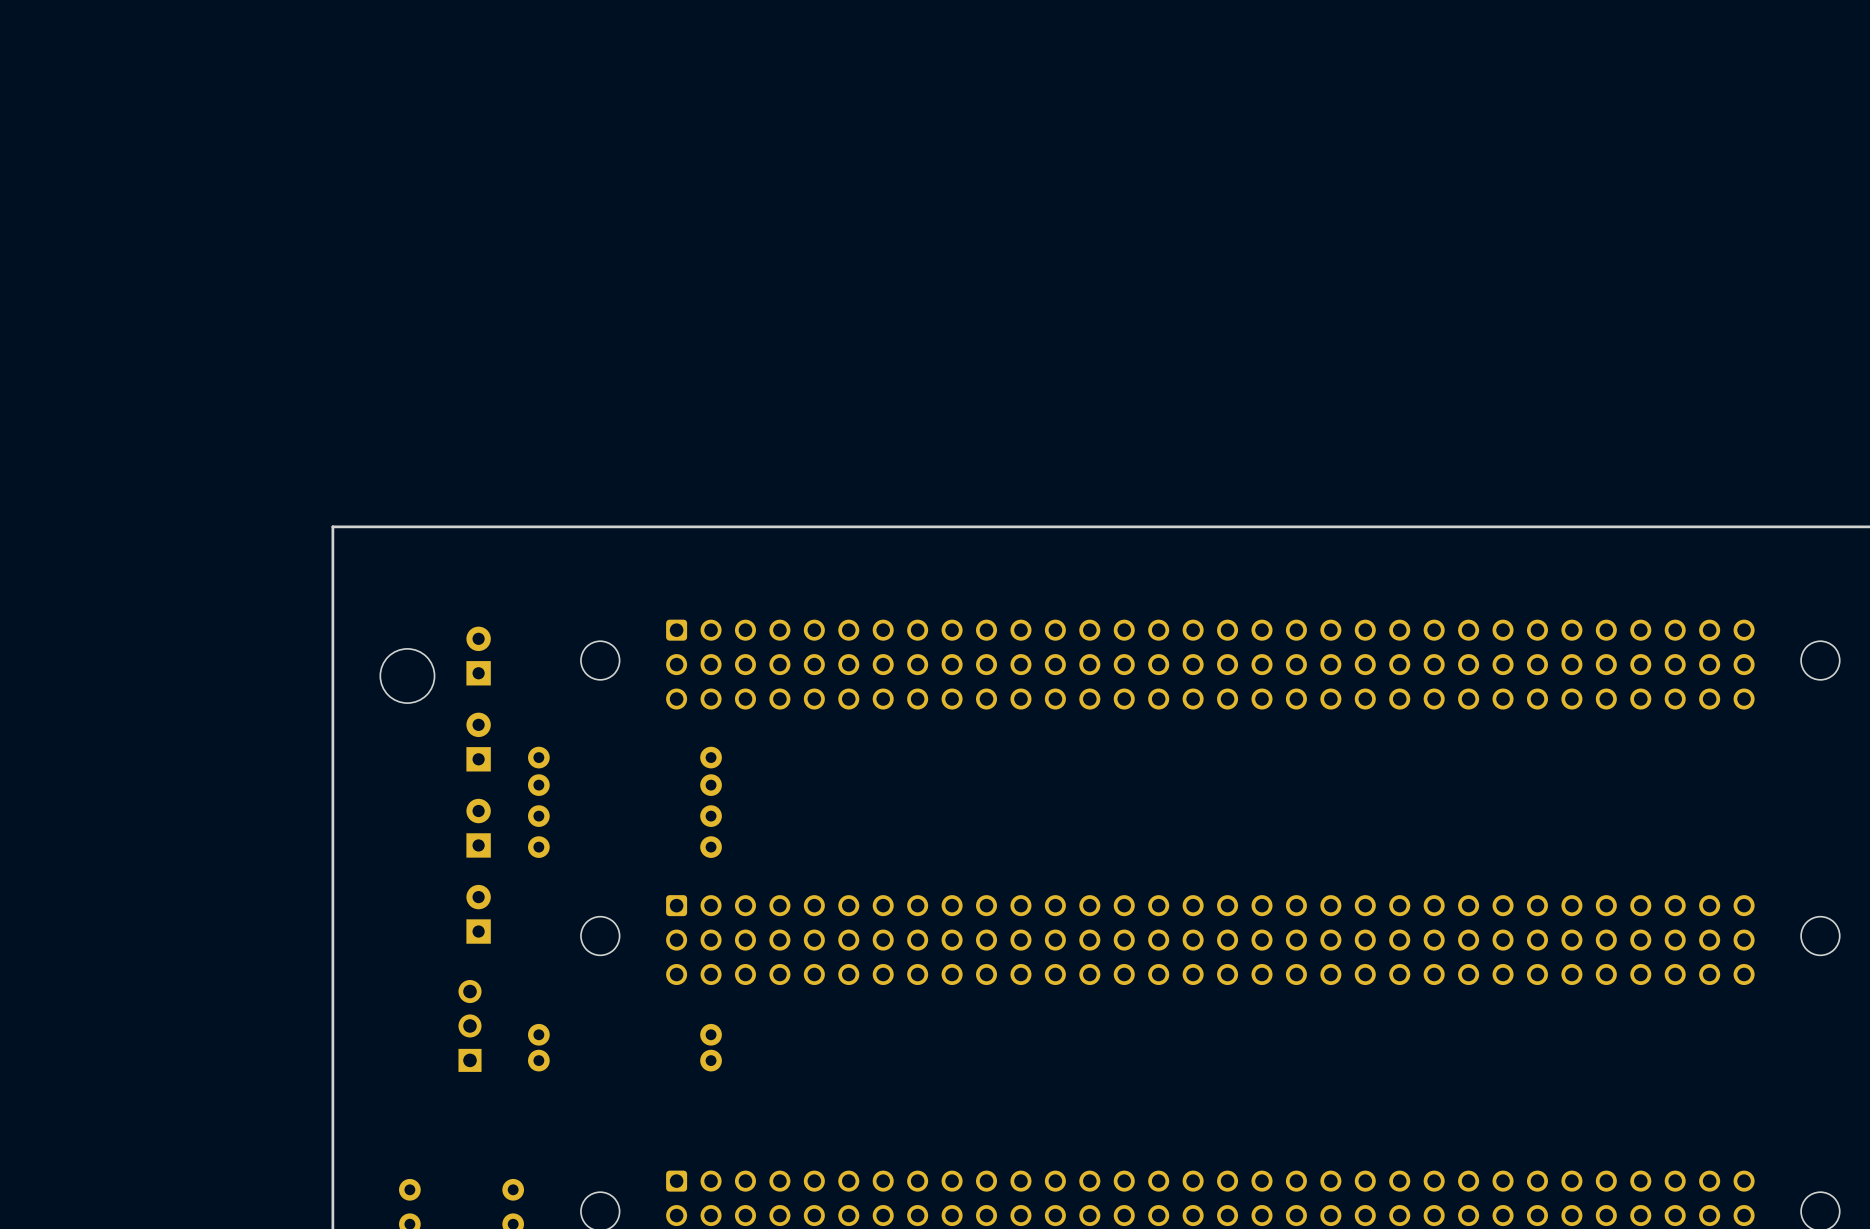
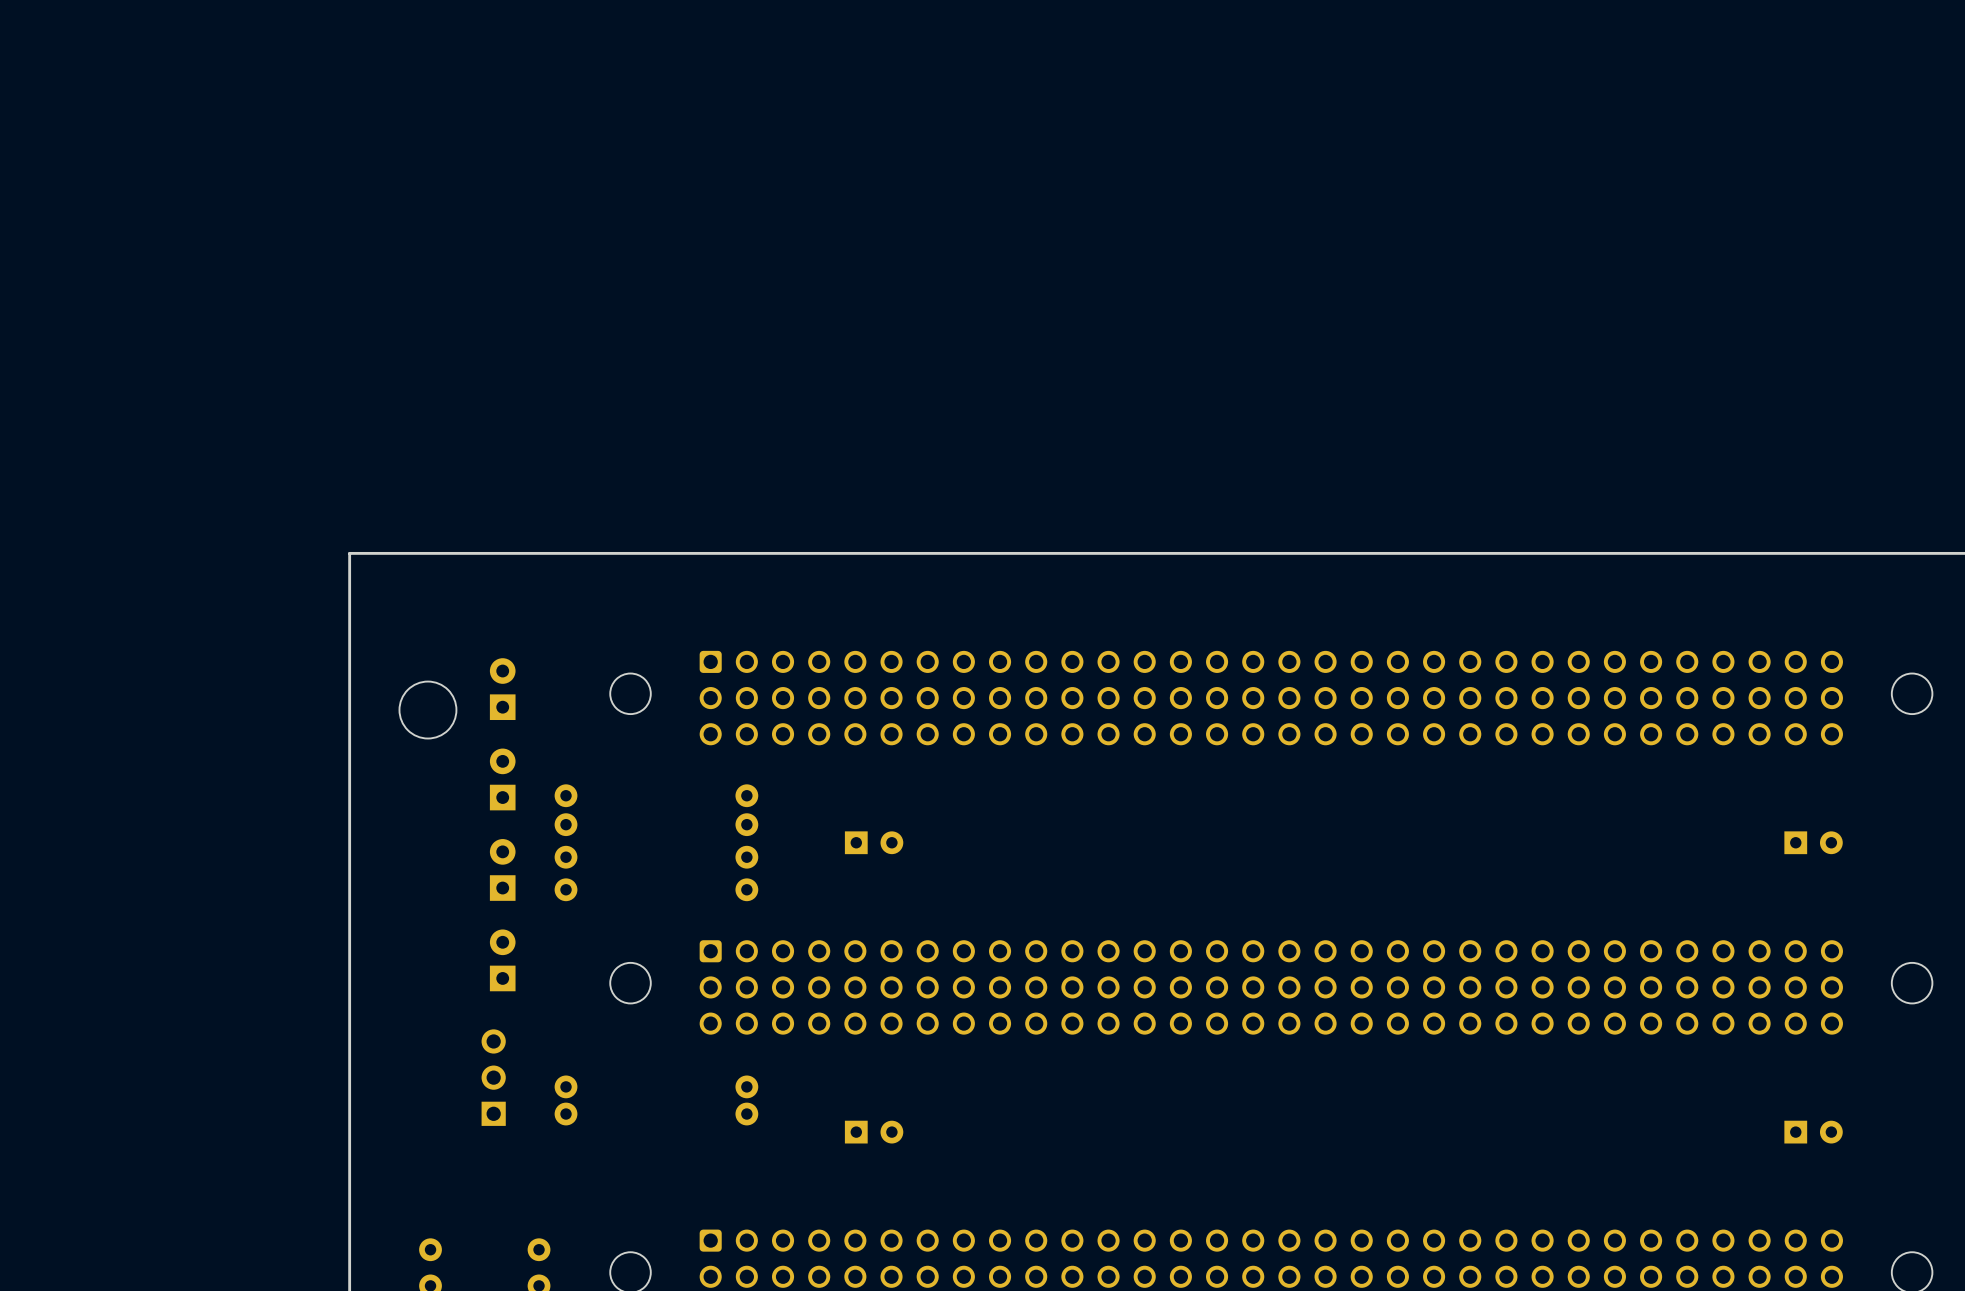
part: none -> (874, 842)
part: none -> (1813, 842)
part: none -> (874, 1132)
part: none -> (1813, 1132)

